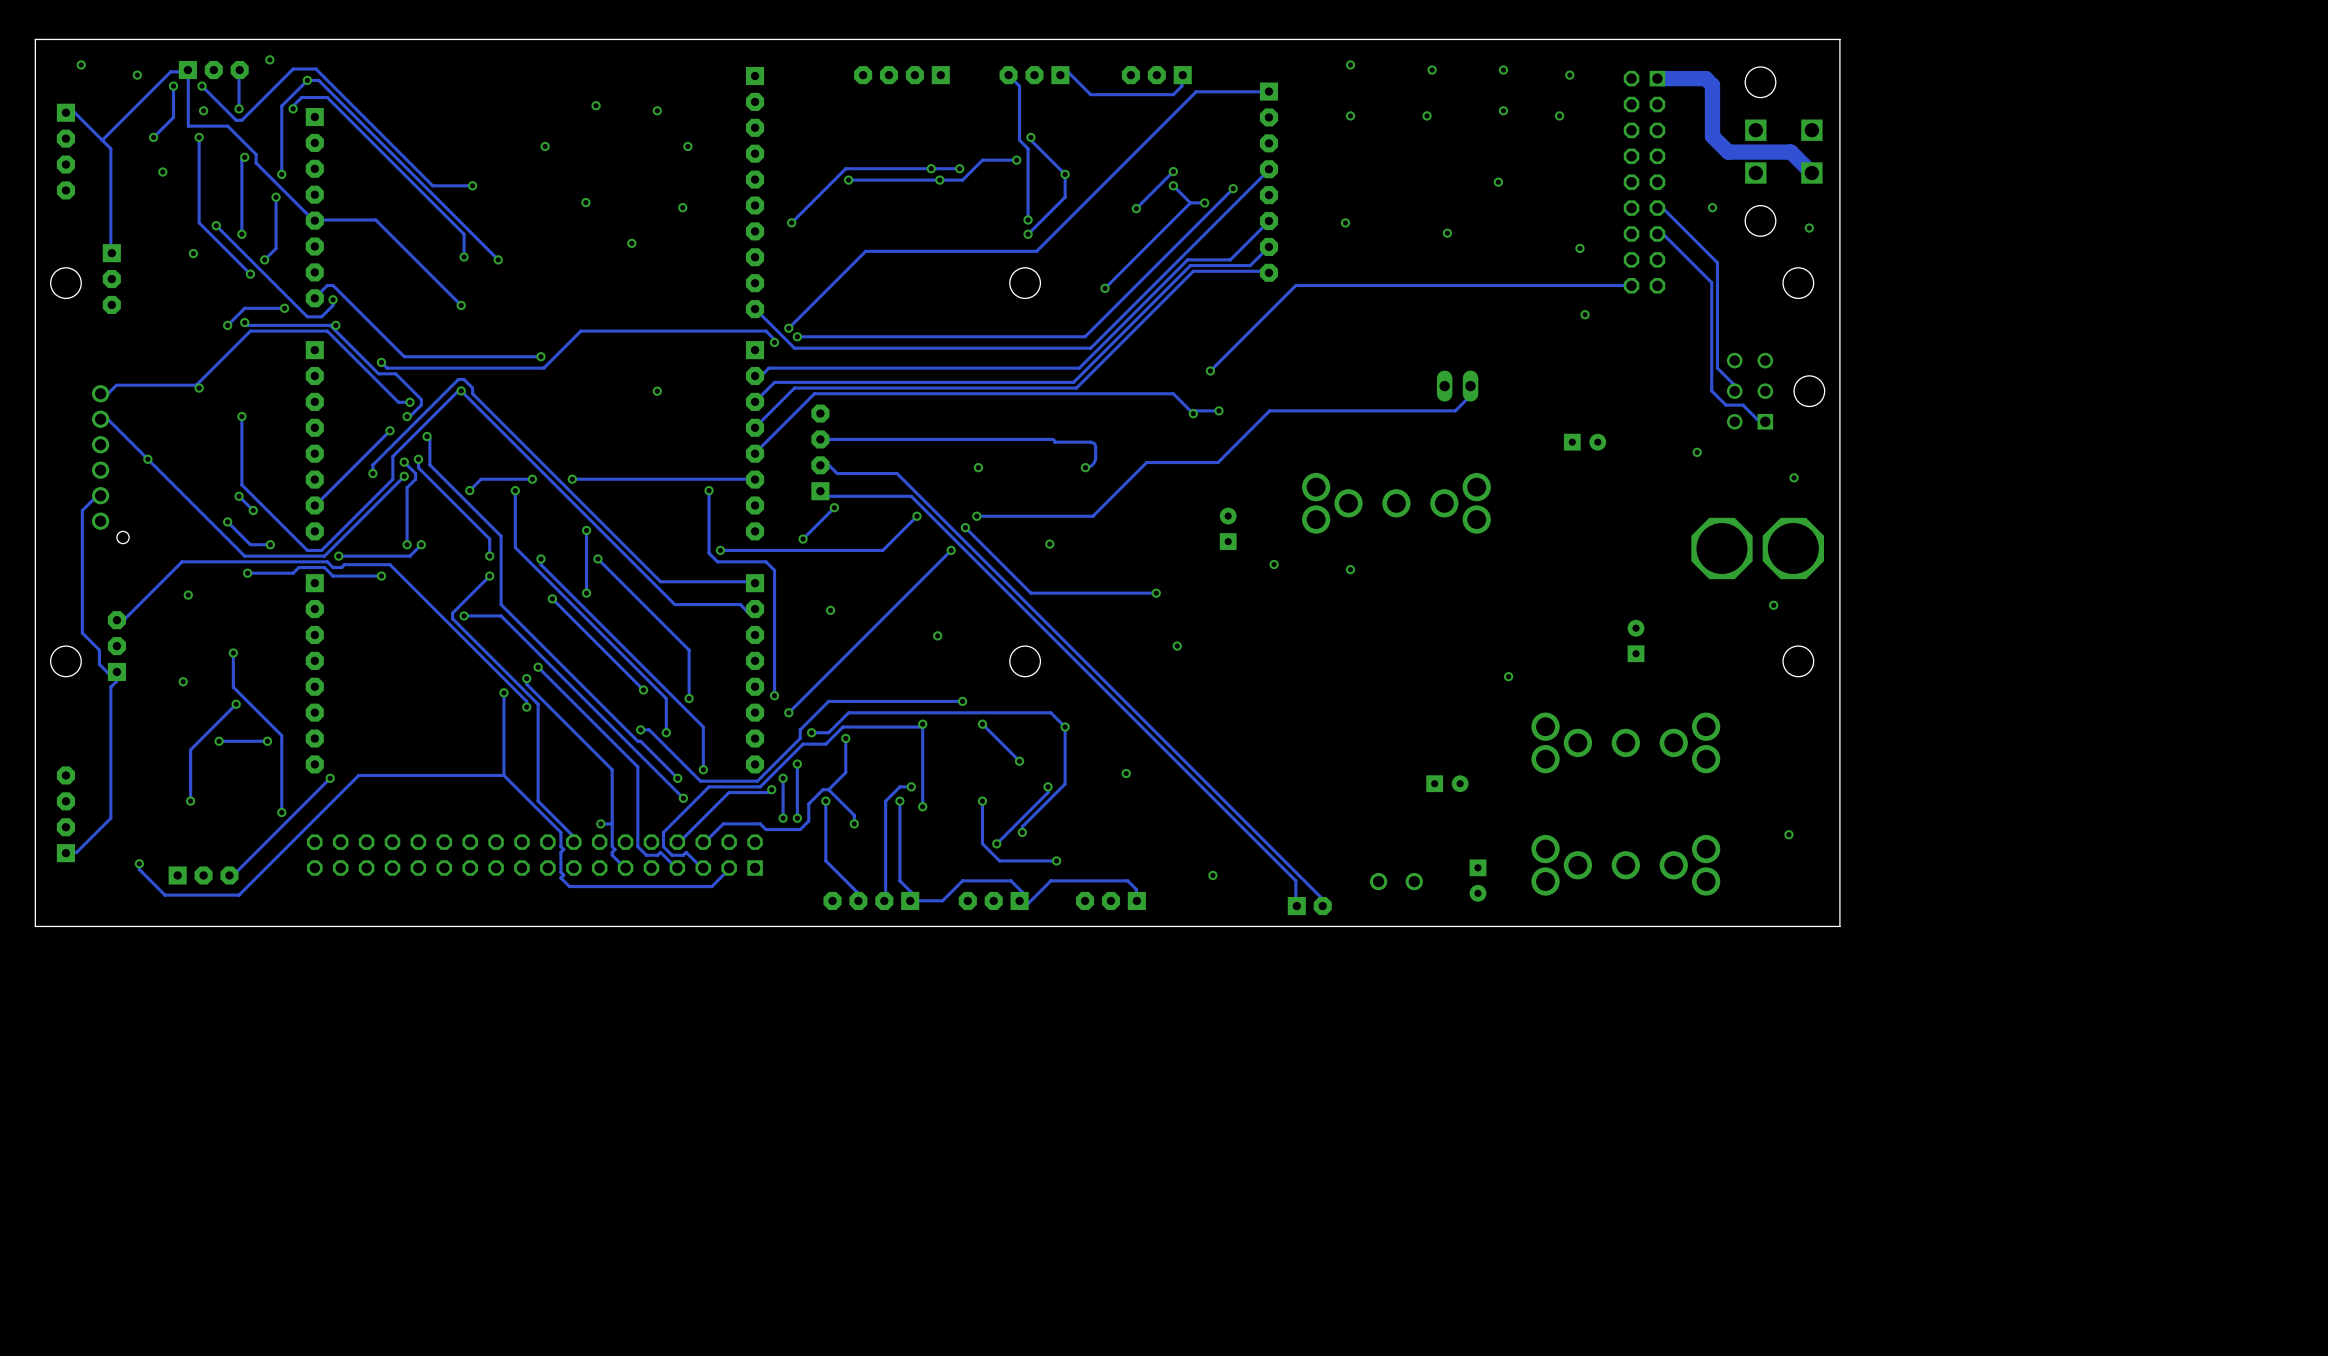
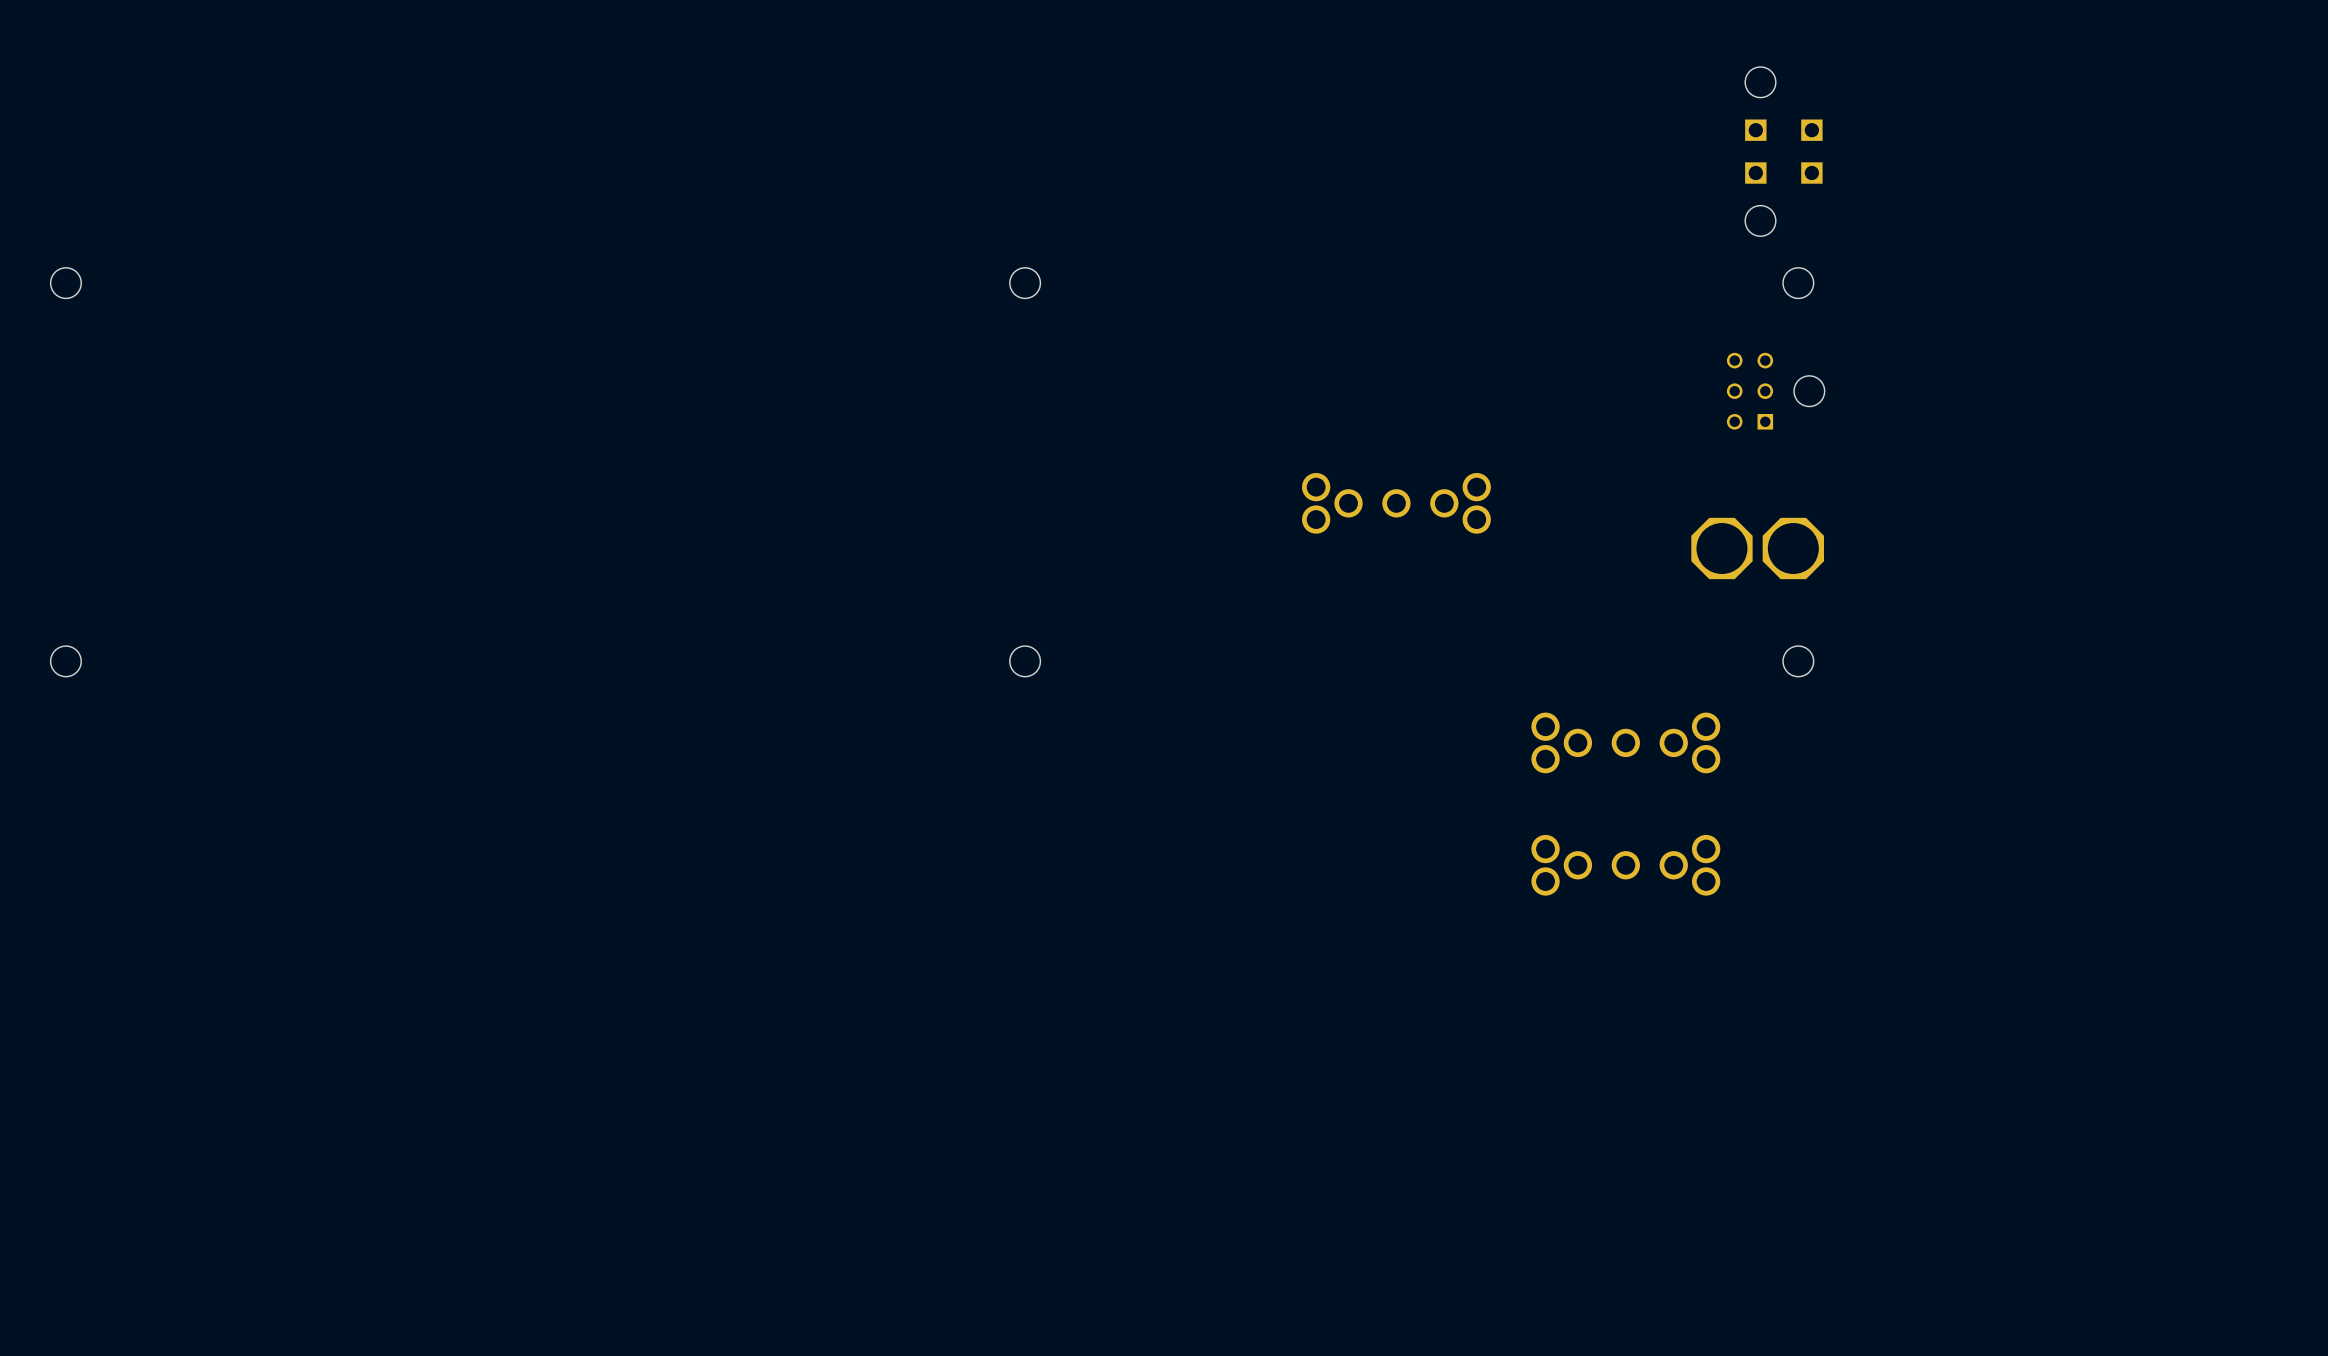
board edge: (1839, 39) (35, 39) (35, 926) (1839, 926) (1839, 39) -> none
via: (269, 59) -> none
via: (81, 64) -> none
via: (1350, 64) -> none
part: (213, 70) -> none
track: (239, 70) (239, 108) -> none
via: (1432, 70) -> none
via: (1503, 70) -> none
via: (137, 75) -> none
part: (901, 75) -> none
track: (1008, 75) (1019, 86) (1019, 140) (1028, 148) (1028, 220) -> none
part: (1034, 75) -> none
part: (1156, 75) -> none
track: (1182, 75) (1181, 86) (1173, 94) (1090, 94) (1067, 71) (1060, 75) -> none
via: (1569, 75) -> none
track: (1657, 78) (1705, 78) (1712, 85) (1712, 136) (1728, 152) (1790, 152) (1811, 173) -> none
via: (307, 80) -> none
track: (173, 86) (173, 117) (153, 137) -> none
via: (173, 86) -> none
track: (202, 86) (236, 120) (241, 120) (293, 69) (315, 69) (432, 185) (472, 185) -> none
via: (202, 86) -> none
track: (1268, 91) (1196, 91) (1036, 251) (865, 251) (788, 328) -> none
via: (596, 105) -> none
via: (239, 108) -> none
track: (293, 108) (293, 106) (301, 97) (327, 97) (464, 234) (464, 257) -> none
via: (293, 108) -> none
via: (203, 110) -> none
via: (657, 110) -> none
via: (1503, 110) -> none
track: (65, 112) (73, 111) (110, 148) (111, 253) -> none
via: (1350, 115) -> none
via: (1427, 115) -> none
via: (1559, 115) -> none
via: (153, 137) -> none
track: (199, 137) (199, 222) (250, 274) -> none
via: (199, 137) -> none
track: (1030, 137) (1030, 140) (1065, 174) (1065, 197) (1028, 234) -> none
via: (1030, 137) -> none
track: (102, 140) (170, 71) (187, 71) (187, 70) (190, 71) (188, 74) (188, 126) (227, 126) (256, 154) (256, 163) (313, 220) (375, 220) (461, 305) -> none
via: (545, 146) -> none
via: (687, 146) -> none
part: (65, 151) -> none
track: (244, 157) (241, 160) (241, 234) -> none
via: (244, 157) -> none
track: (1016, 160) (982, 160) (962, 180) (848, 180) -> none
via: (1016, 160) -> none
via: (931, 168) -> none
track: (959, 168) (845, 168) (791, 222) -> none
via: (959, 168) -> none
track: (1268, 169) (1090, 348) (794, 348) (755, 309) -> none
via: (162, 171) -> none
track: (1173, 171) (1136, 208) -> none
via: (1173, 171) -> none
track: (281, 174) (281, 106) (307, 80) (318, 80) (498, 259) -> none
via: (281, 174) -> none
via: (1065, 174) -> none
via: (848, 180) -> none
via: (939, 180) -> none
part: (1268, 182) -> none
via: (1498, 182) -> none
part: (1644, 182) -> none
via: (472, 185) -> none
track: (1173, 185) (1190, 202) -> none
via: (1173, 185) -> none
track: (1233, 188) (1085, 336) (797, 336) -> none
via: (1233, 188) -> none
part: (755, 192) -> none
track: (276, 197) (276, 248) (264, 259) -> none
via: (276, 197) -> none
via: (585, 202) -> none
track: (1190, 202) (1105, 288) -> none
track: (1204, 202) (1190, 202) -> none
via: (1204, 202) -> none
part: (314, 207) -> none
via: (682, 207) -> none
via: (1712, 207) -> none
via: (1136, 208) -> none
track: (1657, 208) (1663, 208) (1717, 262) (1717, 368) (1734, 385) (1734, 391) -> none
via: (1028, 220) -> none
track: (1268, 221) (1230, 259) (1187, 259) (1079, 368) (768, 368) (763, 373) (755, 376) -> none
via: (791, 222) -> none
via: (1345, 222) -> none
track: (216, 225) (307, 316) (321, 316) (333, 305) (333, 299) -> none
via: (216, 225) -> none
via: (1809, 228) -> none
via: (1447, 233) -> none
track: (1657, 233) (1663, 234) (1711, 282) (1711, 390) (1725, 405) (1743, 405) (1757, 419) (1763, 419) (1765, 421) -> none
via: (241, 234) -> none
via: (1028, 234) -> none
via: (631, 243) -> none
track: (1268, 246) (1250, 265) (1190, 265) (1073, 382) (774, 382) (755, 401) -> none
via: (1579, 248) -> none
via: (193, 253) -> none
via: (464, 257) -> none
via: (264, 259) -> none
via: (498, 259) -> none
track: (1268, 272) (1267, 271) (1193, 271) (1076, 388) (794, 388) (760, 422) (754, 425) (755, 427) -> none
via: (250, 274) -> none
part: (111, 279) -> none
track: (1631, 285) (1295, 285) (1210, 370) -> none
via: (1105, 288) -> none
track: (314, 298) (327, 285) (333, 285) (404, 356) (540, 356) -> none
via: (333, 299) -> none
via: (461, 305) -> none
track: (284, 308) (244, 308) (227, 325) -> none
via: (284, 308) -> none
via: (1585, 314) -> none
track: (244, 322) (247, 325) (335, 325) -> none
via: (244, 322) -> none
via: (227, 325) -> none
track: (330, 325) (378, 373) (395, 373) (421, 399) (421, 405) (409, 416) (407, 416) -> none
via: (335, 325) -> none
via: (788, 328) -> none
via: (797, 336) -> none
track: (774, 342) (774, 339) (766, 331) (580, 331) (543, 368) (387, 368) (381, 362) -> none
via: (774, 342) -> none
via: (540, 356) -> none
via: (381, 362) -> none
via: (1210, 370) -> none
track: (196, 385) (250, 331) (327, 331) (398, 402) (409, 402) -> none
track: (196, 385) (116, 385) (108, 393) (100, 393) -> none
part: (1457, 386) -> none
track: (1470, 386) (1469, 396) (1455, 410) (1269, 410) (1218, 462) (1146, 462) (1092, 516) (976, 516) -> none
via: (199, 388) -> none
via: (461, 390) -> none
via: (657, 391) -> none
via: (409, 402) -> none
track: (1218, 410) (1196, 410) (1193, 413) (1173, 393) (814, 393) (757, 450) (757, 453) (755, 453) -> none
via: (1218, 410) -> none
via: (1193, 413) -> none
track: (241, 416) (241, 484) (307, 550) (321, 550) (392, 479) (392, 456) (458, 390) (461, 390) (674, 604) (740, 604) (746, 610) (755, 609) -> none
via: (241, 416) -> none
via: (407, 416) -> none
track: (100, 419) (108, 419) (244, 556) (324, 556) (404, 476) -> none
track: (390, 430) (314, 505) -> none
via: (390, 430) -> none
track: (427, 436) (429, 439) (429, 464) (501, 536) (501, 604) (637, 741) (640, 741) (677, 778) -> none
via: (427, 436) -> none
track: (820, 439) (1052, 439) (1054, 442) (1091, 442) (1095, 446) (1095, 460) (1091, 465) (1085, 467) -> none
part: (314, 440) -> none
part: (755, 440) -> none
part: (1585, 442) -> none
part: (820, 452) -> none
via: (1697, 452) -> none
via: (147, 459) -> none
track: (418, 459) (418, 467) (489, 539) (489, 556) -> none
via: (418, 459) -> none
track: (404, 462) (415, 473) (415, 479) (407, 487) (407, 544) -> none
via: (404, 462) -> none
part: (110, 464) -> none
track: (820, 465) (828, 464) (837, 473) (897, 473) (1321, 897) (1322, 906) -> none
via: (978, 467) -> none
via: (1085, 467) -> none
track: (372, 473) (372, 464) (458, 379) (464, 379) (472, 388) (472, 393) (660, 581) (755, 583) -> none
via: (372, 473) -> none
via: (404, 476) -> none
via: (1794, 477) -> none
track: (532, 479) (481, 479) (469, 490) -> none
via: (532, 479) -> none
track: (572, 479) (755, 479) -> none
via: (572, 479) -> none
via: (469, 490) -> none
track: (515, 490) (515, 547) (666, 698) (666, 732) -> none
via: (515, 490) -> none
track: (709, 490) (709, 553) (717, 561) (766, 561) (774, 570) (774, 695) -> none
via: (709, 490) -> none
track: (820, 491) (825, 496) (911, 496) (1295, 880) (1296, 906) -> none
track: (100, 495) (96, 496) (82, 510) (82, 633) (99, 650) (99, 664) (108, 672) (116, 672) -> none
track: (239, 496) (253, 510) -> none
via: (239, 496) -> none
track: (834, 507) (803, 539) -> none
via: (834, 507) -> none
via: (253, 510) -> none
track: (916, 516) (882, 550) (720, 550) -> none
via: (916, 516) -> none
via: (976, 516) -> none
track: (227, 521) (250, 544) (270, 544) -> none
via: (227, 521) -> none
track: (965, 527) (1030, 593) (1156, 593) -> none
via: (965, 527) -> none
part: (1228, 528) -> none
track: (586, 530) (586, 593) -> none
via: (586, 530) -> none
via: (803, 539) -> none
via: (270, 544) -> none
via: (407, 544) -> none
track: (421, 544) (409, 556) (338, 556) -> none
via: (421, 544) -> none
via: (1049, 544) -> none
via: (720, 550) -> none
track: (951, 550) (788, 712) -> none
via: (951, 550) -> none
via: (338, 556) -> none
via: (489, 556) -> none
track: (540, 558) (540, 564) (703, 727) (703, 769) -> none
via: (540, 558) -> none
track: (597, 558) (689, 650) (689, 698) -> none
via: (597, 558) -> none
via: (1274, 564) -> none
via: (1350, 569) -> none
track: (247, 573) (293, 573) (298, 567) (324, 567) (333, 576) (381, 576) -> none
via: (247, 573) -> none
via: (381, 576) -> none
track: (489, 576) (452, 613) (452, 618) (538, 704) (538, 801) (572, 835) (573, 842) -> none
via: (489, 576) -> none
via: (586, 593) -> none
via: (1156, 593) -> none
via: (188, 595) -> none
track: (552, 598) (643, 690) -> none
via: (552, 598) -> none
via: (1773, 605) -> none
via: (830, 610) -> none
track: (464, 615) (501, 615) (683, 798) -> none
via: (464, 615) -> none
track: (116, 620) (125, 618) (182, 561) (327, 561) (333, 567) (341, 567) (344, 564) (390, 564) (526, 701) (526, 707) -> none
via: (937, 635) -> none
part: (1636, 640) -> none
part: (116, 646) -> none
via: (1177, 646) -> none
track: (233, 652) (233, 687) (281, 735) (281, 812) -> none
via: (233, 652) -> none
track: (538, 667) (637, 766) (637, 846) (646, 855) (657, 855) (660, 852) (677, 868) -> none
via: (538, 667) -> none
track: (116, 672) (116, 681) (110, 687) (110, 818) (76, 852) (65, 853) -> none
part: (314, 673) -> none
part: (755, 673) -> none
via: (1508, 676) -> none
track: (526, 678) (526, 684) (612, 769) (612, 846) (615, 849) (612, 855) (620, 863) (623, 863) (625, 868) -> none
via: (526, 678) -> none
via: (183, 681) -> none
via: (643, 690) -> none
track: (503, 692) (503, 775) -> none
via: (503, 692) -> none
via: (774, 695) -> none
via: (689, 698) -> none
track: (962, 701) (828, 701) (800, 729) (800, 738) (757, 781) (700, 781) (649, 729) (640, 729) -> none
via: (962, 701) -> none
track: (236, 704) (190, 749) (190, 801) -> none
via: (236, 704) -> none
via: (526, 707) -> none
via: (788, 712) -> none
track: (922, 724) (922, 806) -> none
via: (922, 724) -> none
track: (982, 724) (1019, 761) -> none
via: (982, 724) -> none
track: (922, 727) (842, 727) (825, 744) (803, 744) (760, 786) (709, 786) (663, 832) (663, 846) (672, 855) (683, 855) (686, 852) (703, 868) -> none
via: (1065, 727) -> none
via: (640, 729) -> none
via: (666, 732) -> none
track: (811, 732) (828, 732) (848, 712) (1050, 712) (1065, 727) (1065, 784) (1022, 826) (1022, 832) -> none
via: (811, 732) -> none
track: (845, 738) (845, 772) (828, 789) -> none
via: (845, 738) -> none
via: (219, 741) -> none
track: (267, 741) (219, 741) -> none
via: (267, 741) -> none
via: (1019, 761) -> none
track: (797, 764) (797, 818) -> none
via: (797, 764) -> none
via: (703, 769) -> none
via: (1126, 773) -> none
track: (503, 775) (560, 832) (560, 846) (563, 849) (560, 852) (560, 872) (563, 875) (560, 878) (569, 886) (711, 886) (729, 868) -> none
track: (503, 775) (358, 775) (239, 895) (164, 895) (139, 869) (139, 863) -> none
track: (330, 778) (230, 878) (229, 875) -> none
via: (330, 778) -> none
via: (677, 778) -> none
track: (783, 778) (783, 818) -> none
via: (783, 778) -> none
part: (1447, 783) -> none
track: (911, 786) (899, 786) (885, 801) (884, 900) -> none
via: (911, 786) -> none
track: (1048, 786) (1048, 792) (996, 843) -> none
via: (1048, 786) -> none
track: (771, 789) (768, 792) (728, 792) (677, 842) -> none
via: (771, 789) -> none
track: (828, 789) (854, 815) (854, 823) -> none
track: (828, 789) (822, 789) (808, 803) (808, 821) (800, 829) (766, 829) (760, 823) (723, 823) (703, 843) (703, 842) -> none
via: (683, 798) -> none
via: (190, 801) -> none
track: (825, 801) (825, 860) (857, 892) (858, 900) -> none
via: (825, 801) -> none
track: (899, 801) (899, 880) (911, 892) (911, 900) -> none
via: (899, 801) -> none
track: (982, 801) (982, 843) (999, 860) (1056, 860) -> none
via: (982, 801) -> none
via: (922, 806) -> none
via: (281, 812) -> none
part: (65, 814) -> none
via: (783, 818) -> none
via: (797, 818) -> none
via: (600, 823) -> none
track: (612, 823) (600, 823) -> none
via: (854, 823) -> none
via: (1022, 832) -> none
via: (1788, 834) -> none
via: (996, 843) -> none
part: (534, 855) -> none
via: (1056, 860) -> none
via: (139, 863) -> none
part: (203, 875) -> none
via: (1212, 875) -> none
part: (1478, 880) -> none
part: (1396, 881) -> none
part: (871, 900) -> none
track: (911, 900) (942, 900) (962, 880) (1010, 880) (1022, 892) (1022, 900) (1019, 900) (1022, 903) (1028, 903) (1050, 880) (1127, 880) (1136, 889) (1136, 900) -> none
part: (993, 900) -> none
part: (1110, 900) -> none
part: (1309, 906) -> none

